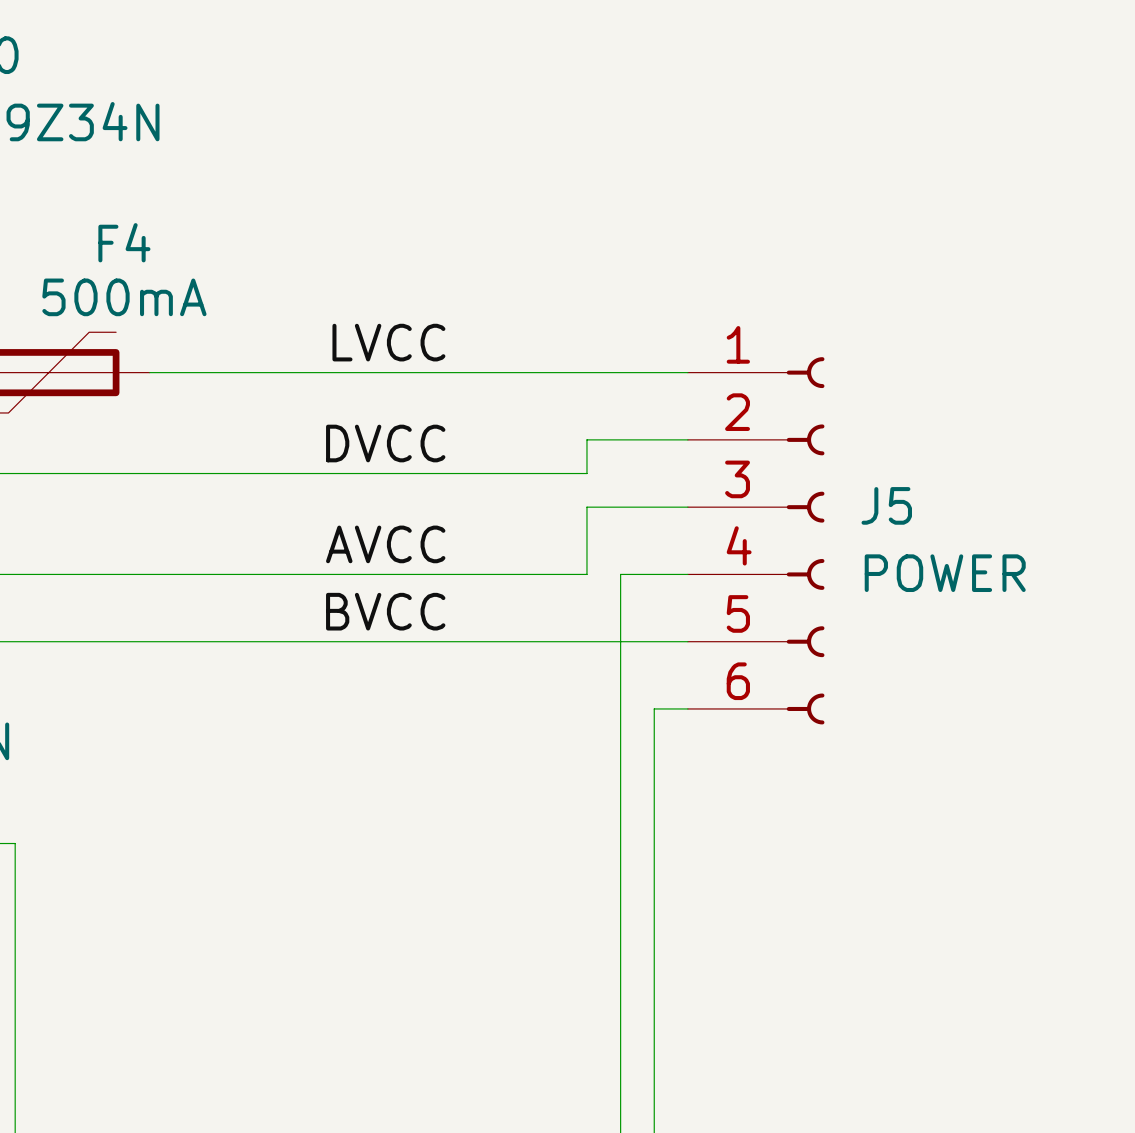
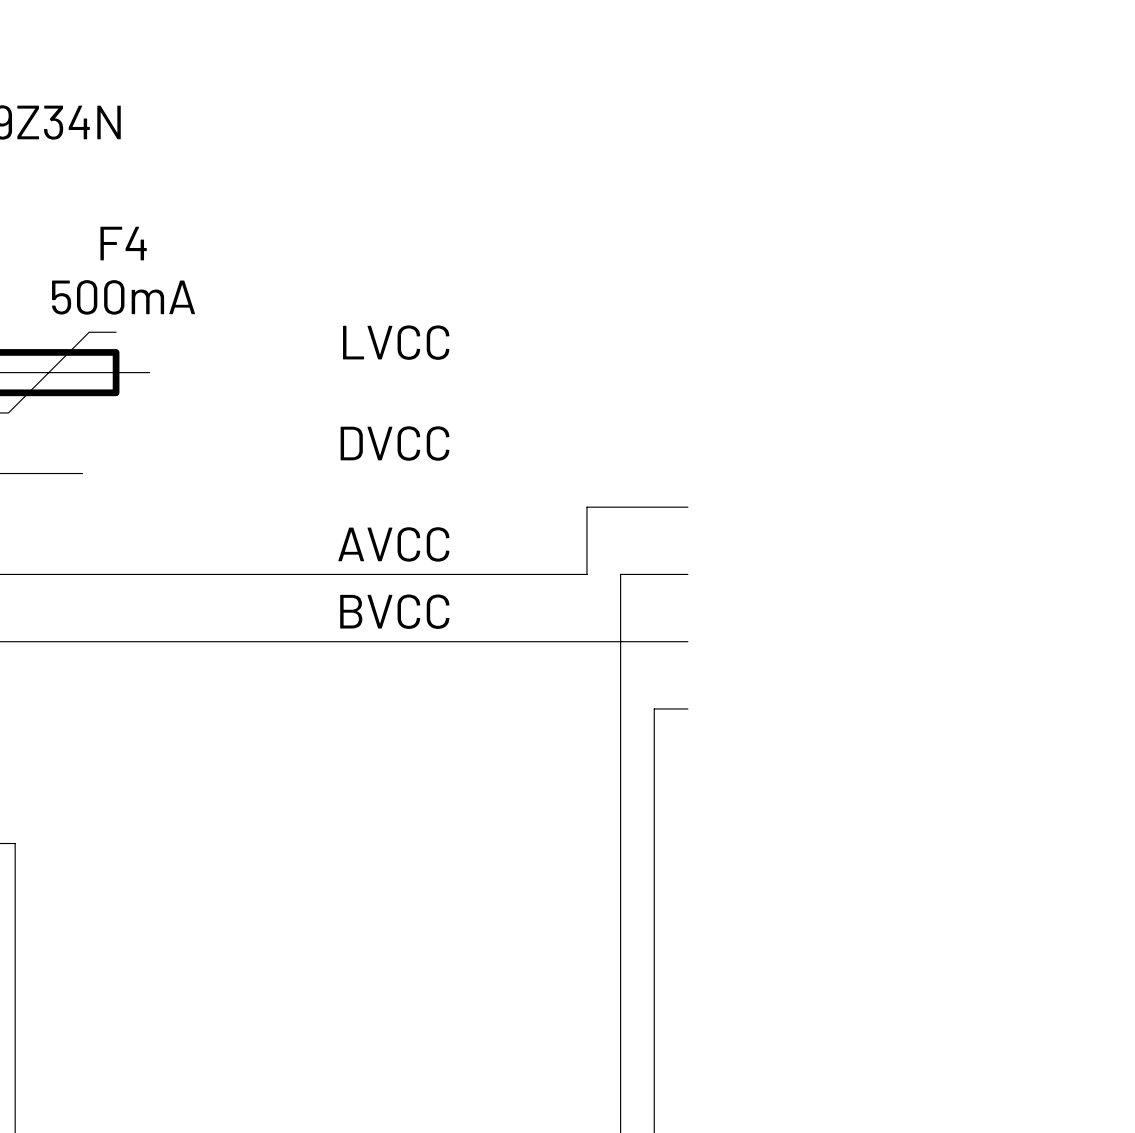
wire: (149, 372) (687, 372) -> none
wire: (687, 439) (586, 439) (586, 473) (82, 473) -> none
J5: POWER (756, 540) -> none

